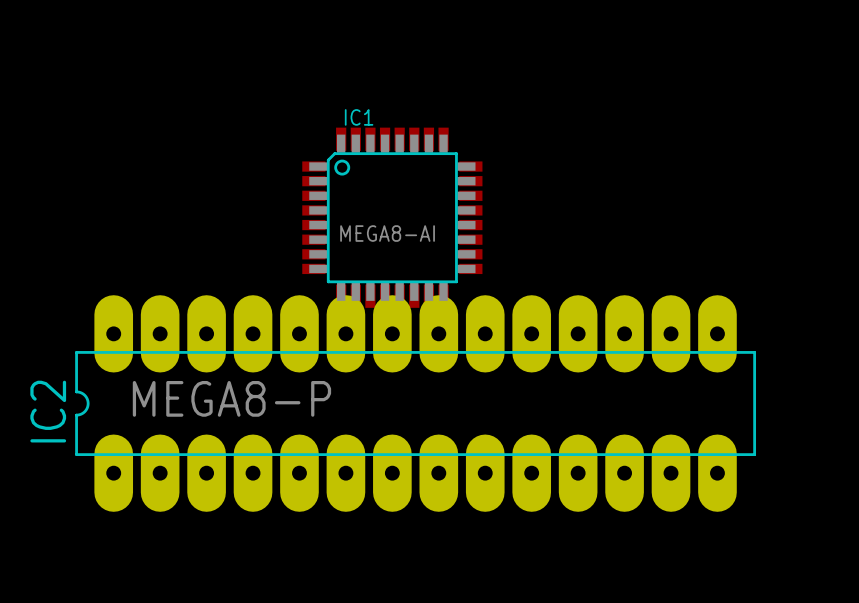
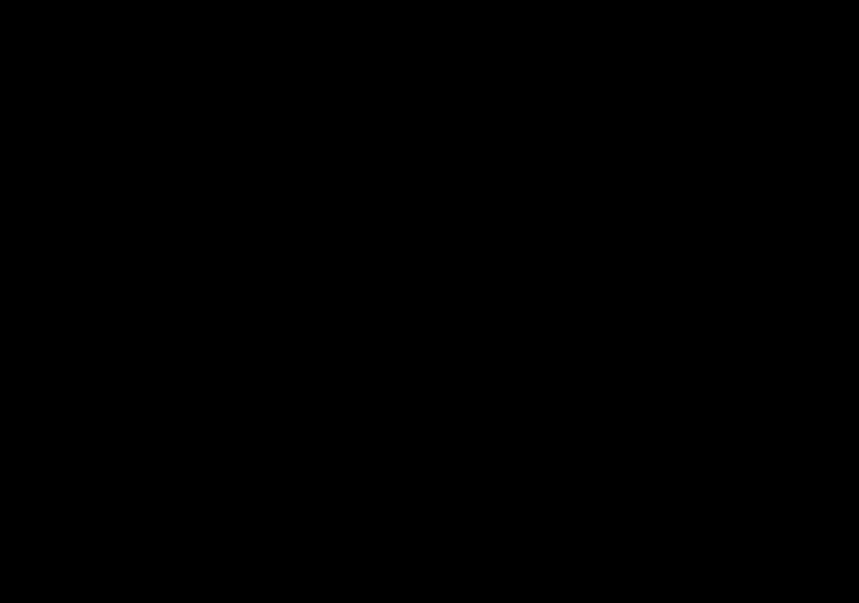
IC1: MEGA8-AI (392, 217) -> none
IC2: MEGA8-P (415, 403) -> none

